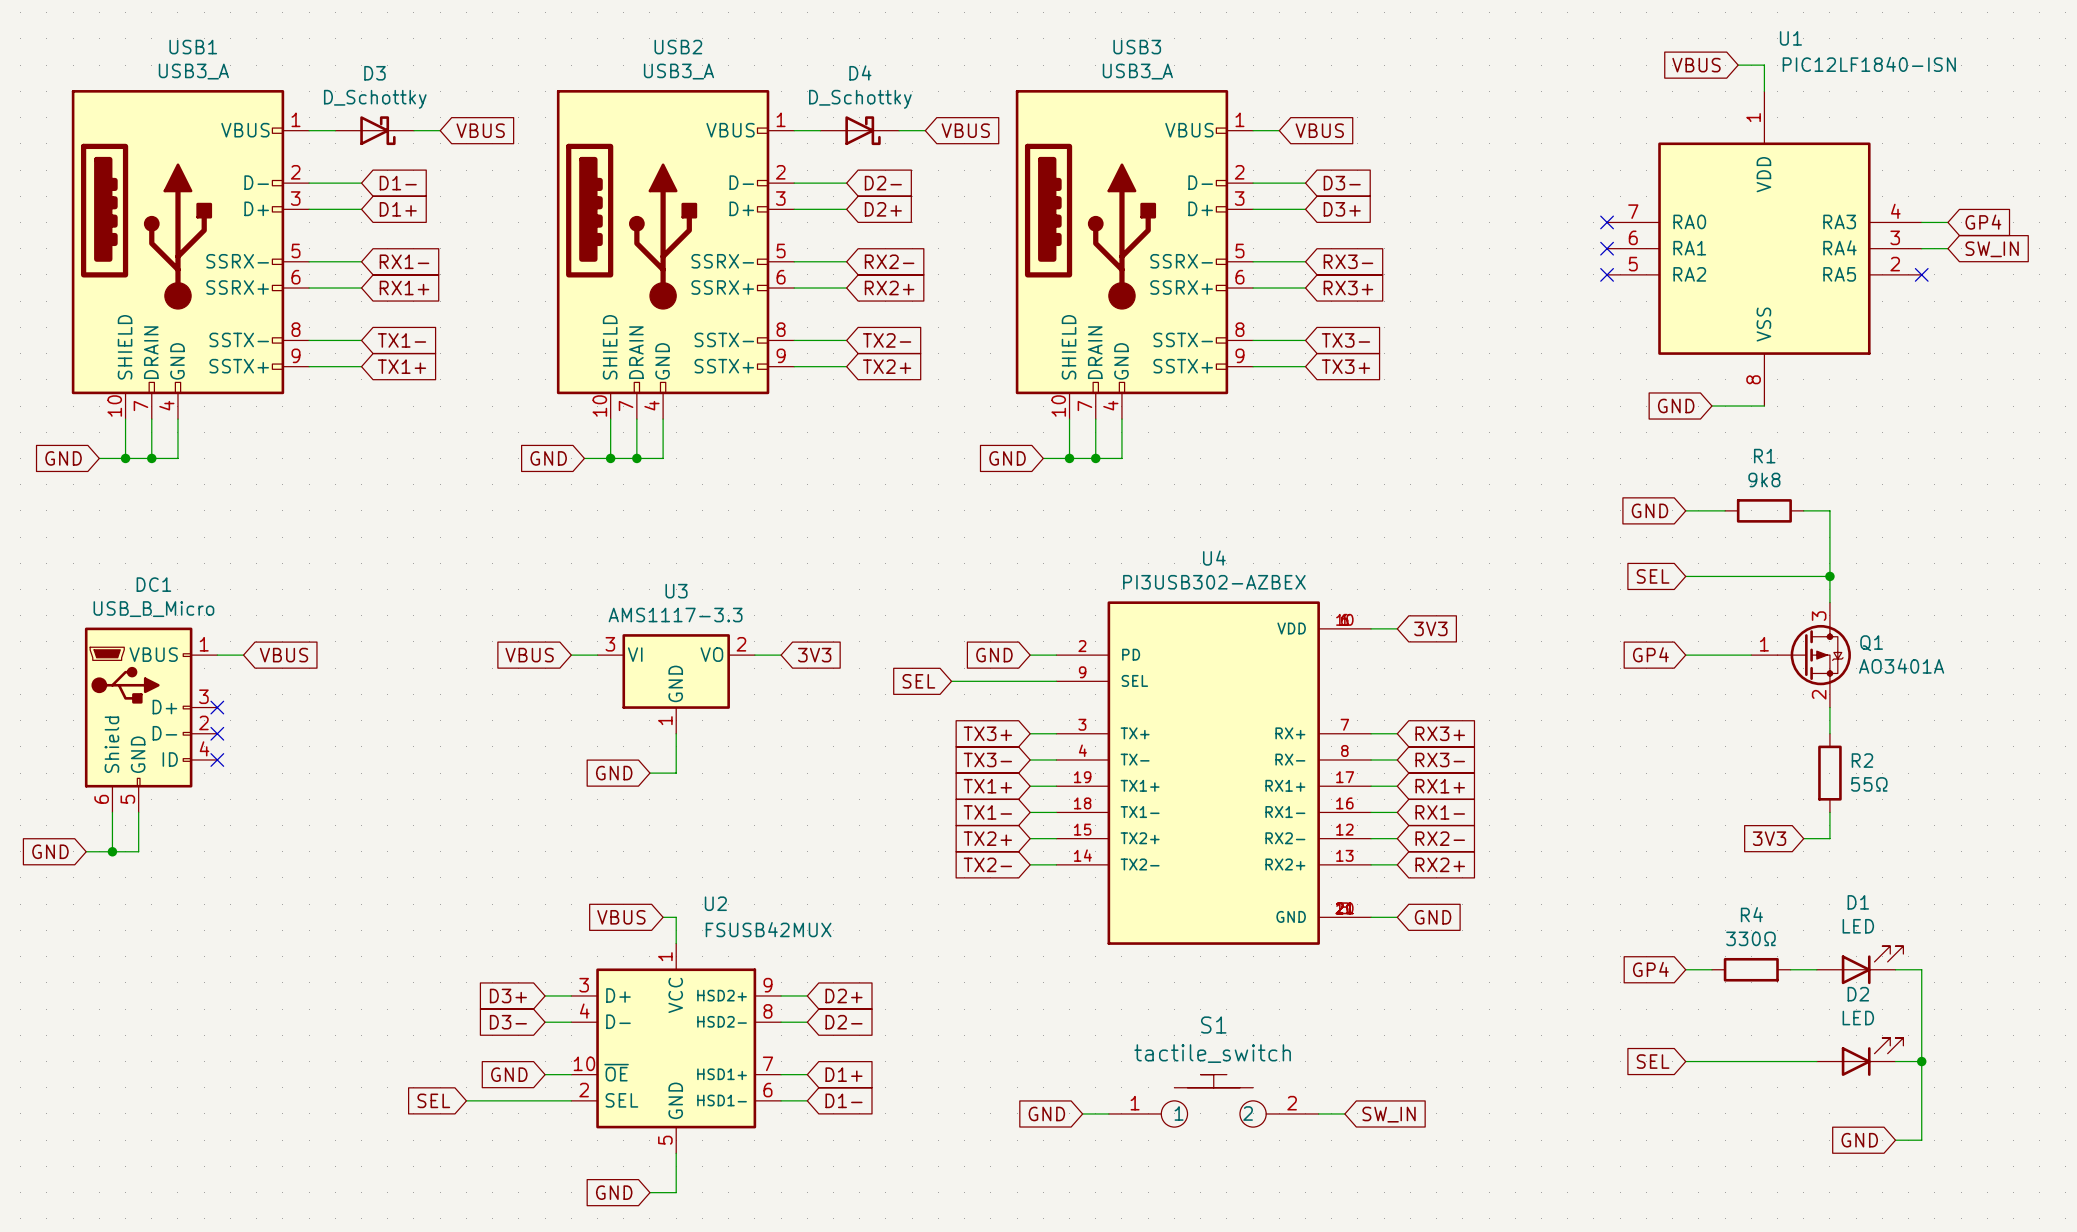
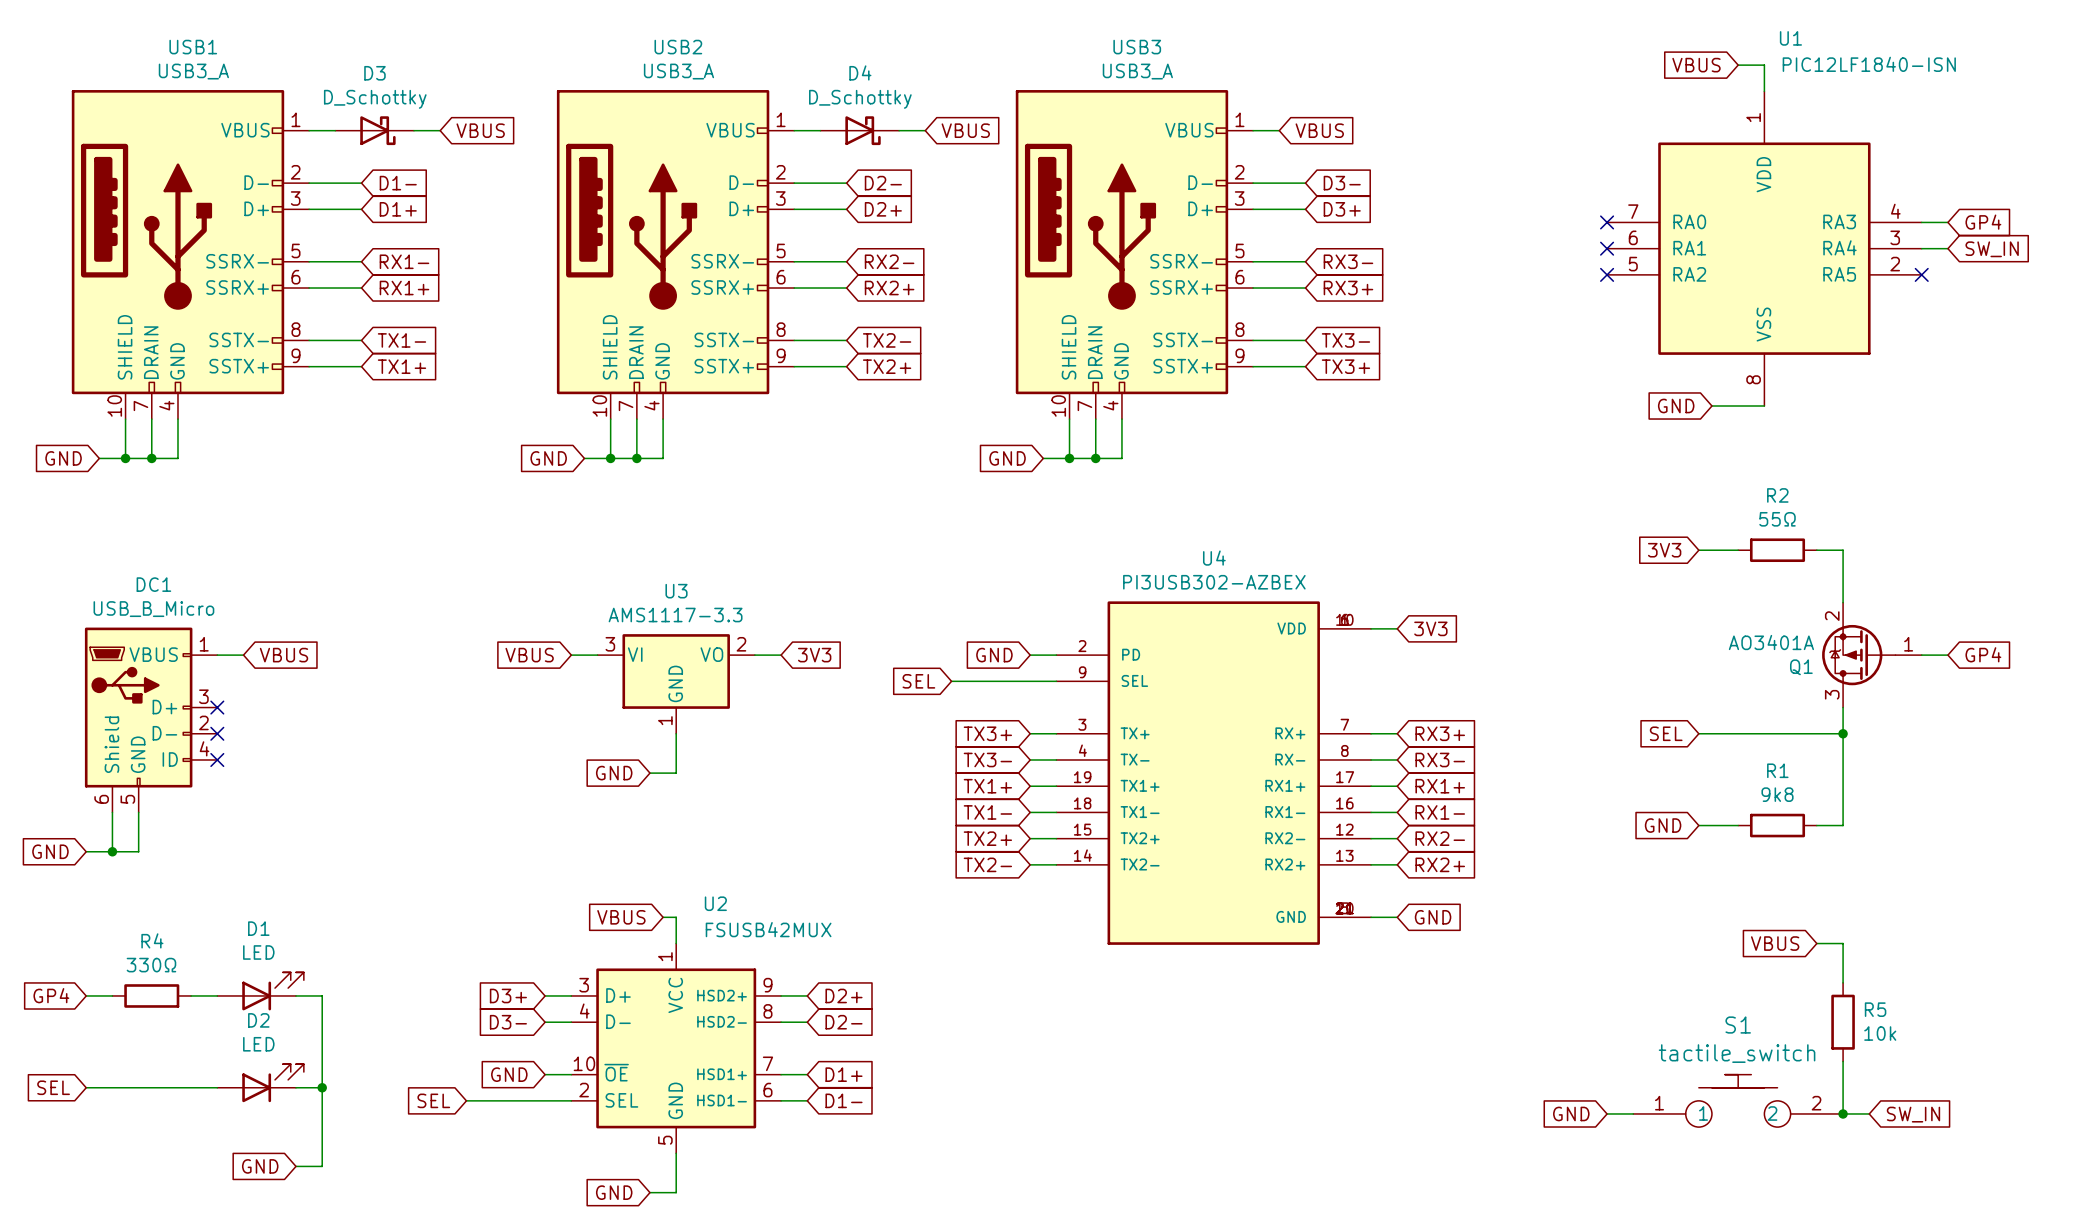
global label: GND (1649, 510) -> none
wire: (1685, 510) (1725, 510) -> (1698, 550) (1738, 550)
R1 position: (1764, 510) -> (1777, 825)
wire: (1803, 510) (1829, 510) (1829, 602) -> none
global label: none -> 3V3 (1664, 550)
wire: none -> (1816, 550) (1843, 550) (1843, 602)
global label position: SEL (1653, 576) -> SEL (1666, 733)
wire: (1685, 576) (1829, 576) -> (1698, 733) (1843, 733)
junction: (1829, 576) -> none
global label: GP4 (1650, 654) -> none
global label: none -> GP4 (1983, 654)
wire: (1685, 655) (1751, 655) -> none
Q1 position: (1801, 655) -> (1871, 655)
Q1 rotation: 0° (1814, 655) -> 180° (1858, 655)
wire: none -> (1921, 655) (1947, 655)
wire: (1829, 707) (1829, 733) -> none
wire: none -> (1843, 707) (1843, 825) (1816, 825)
junction: none -> (1843, 733)
R2 name position: R2 (1862, 760) -> R2 (1777, 495)
R2 rotation: 0° (1829, 773) -> 90° clockwise (1777, 550)
R2 position: (1829, 773) -> (1777, 550)
R2 value position: 55Ω (1869, 784) -> 55Ω (1777, 519)
wire: (1829, 812) (1829, 838) (1803, 838) -> none
global label: none -> GND (1663, 825)
wire: none -> (1698, 825) (1738, 825)
global label: 3V3 (1769, 838) -> none
global label: none -> VBUS (1775, 943)
wire: none -> (1816, 943) (1843, 943) (1843, 982)
D1 position: (1860, 965) -> (260, 991)
global label: GP4 (1650, 969) -> none
wire: (1685, 969) (1711, 969) -> (1607, 1113) (1633, 1113)
R4 position: (1751, 969) -> (151, 995)
wire: (1790, 969) (1816, 969) -> none
wire: (1895, 969) (1921, 969) (1921, 1140) (1895, 1140) -> none
global label: none -> GP4 (51, 995)
wire: none -> (86, 995) (112, 995)
wire: none -> (191, 995) (217, 995)
wire: none -> (295, 995) (322, 995) (322, 1166) (295, 1166)
R5: none -> 10k (1843, 1022)
D2 position: (1860, 1056) -> (260, 1083)
global label: SEL (1653, 1061) -> none
wire: (1685, 1061) (1816, 1061) -> none
wire: none -> (1843, 1061) (1843, 1113) (1869, 1113)
wire: (1895, 1061) (1921, 1061) -> none
junction: (1921, 1061) -> none
global label: none -> SEL (53, 1087)
wire: none -> (86, 1087) (217, 1087)
wire: none -> (295, 1087) (322, 1087)
junction: none -> (322, 1087)
S1 position: (1213, 1100) -> (1738, 1100)
global label: GND (1046, 1113) -> none
wire: (1082, 1113) (1108, 1113) -> none
wire: (1318, 1113) (1344, 1113) -> none
global label: none -> GND (1571, 1113)
junction: none -> (1843, 1113)
global label: SW_IN (1389, 1114) -> none
global label: none -> SW_IN (1913, 1114)
global label: GND (1859, 1140) -> none
global label: none -> GND (260, 1166)

